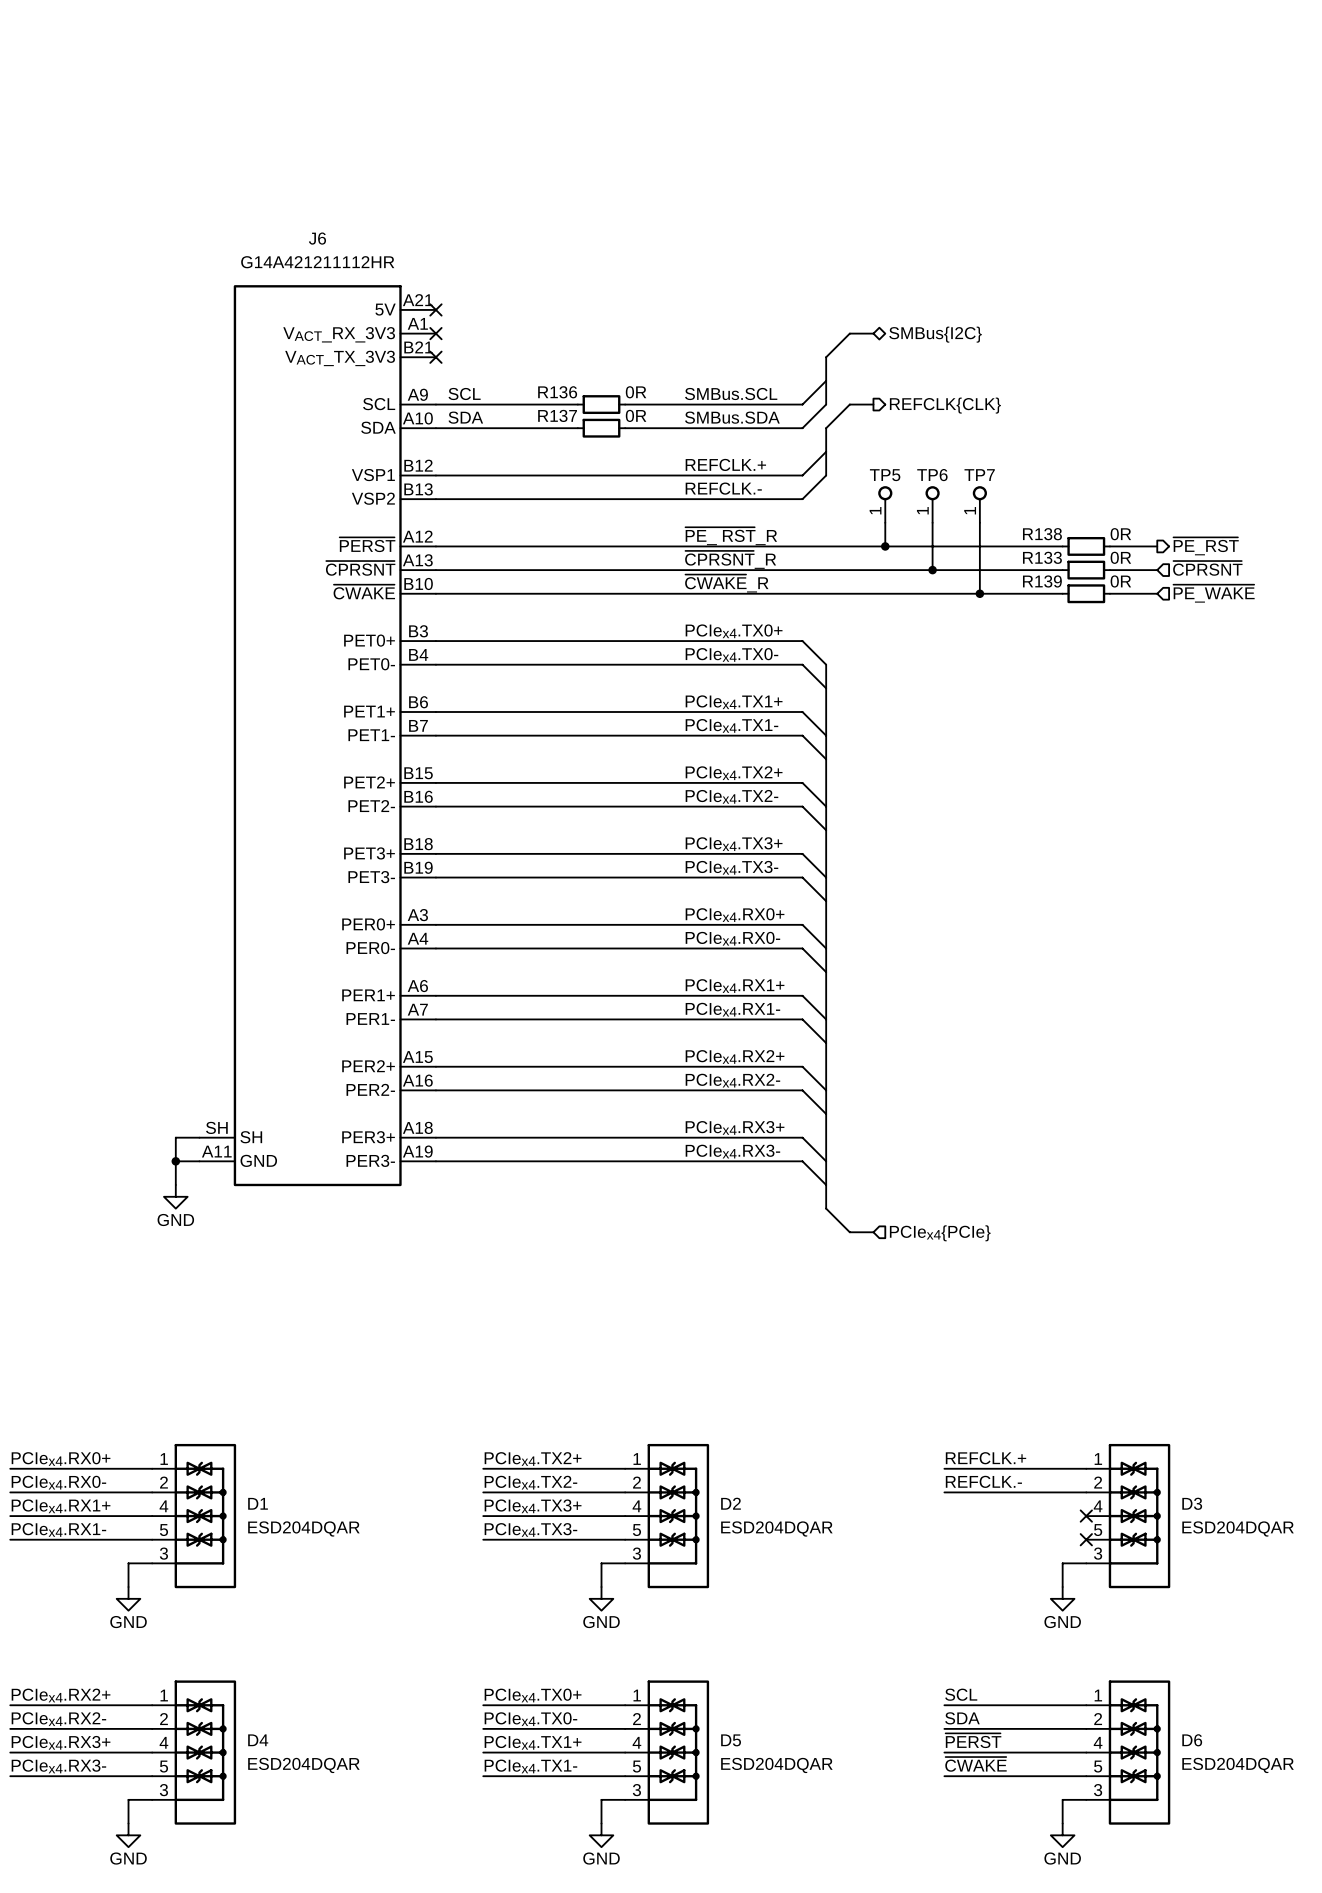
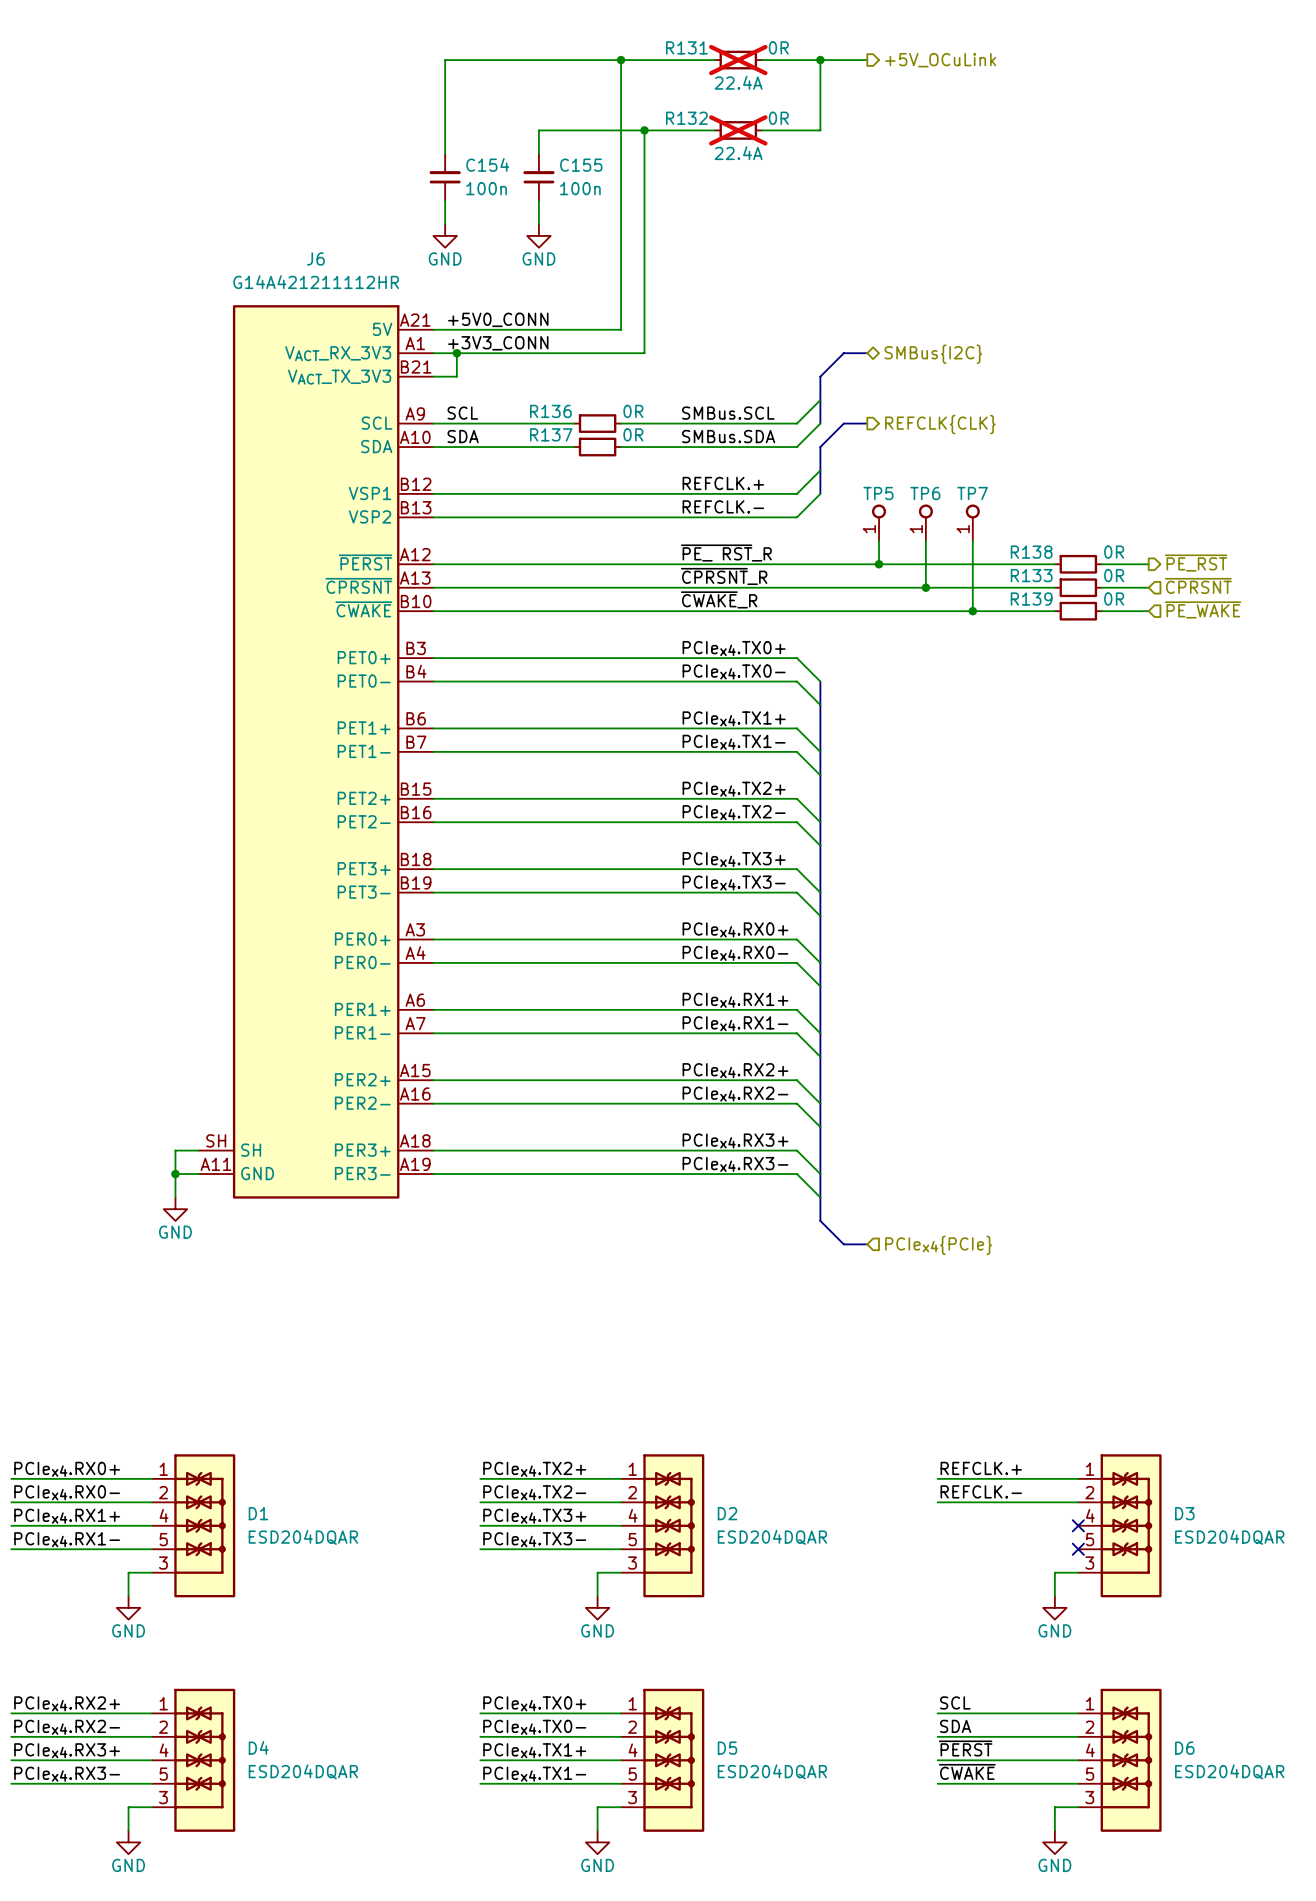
wire: none -> (621, 60) (621, 329) (433, 329)
junction: none -> (621, 60)
wire: none -> (714, 60) (445, 60) (445, 153)
R131: none -> (738, 60)
wire: none -> (761, 60) (867, 60)
wire: none -> (820, 60) (820, 130) (761, 130)
junction: none -> (820, 60)
hierarchical label: none -> +5V_OCuLink (940, 60)
wire: none -> (644, 130) (644, 353) (433, 353)
junction: none -> (644, 130)
wire: none -> (714, 130) (538, 130) (538, 153)
R132: none -> (738, 130)
C154: none -> (445, 177)
C155: none -> (538, 177)
wire: none -> (445, 200) (445, 224)
wire: none -> (538, 200) (538, 224)
power symbol: none -> GND (445, 235)
power symbol: none -> GND (538, 235)
label: none -> +5V0_CONN (498, 319)
no-connect mark: (435, 309) -> none
label: none -> +3V3_CONN (498, 343)
no-connect mark: (435, 333) -> none
wire: none -> (456, 353) (456, 376) (433, 376)
junction: none -> (456, 353)
no-connect mark: (435, 357) -> none

